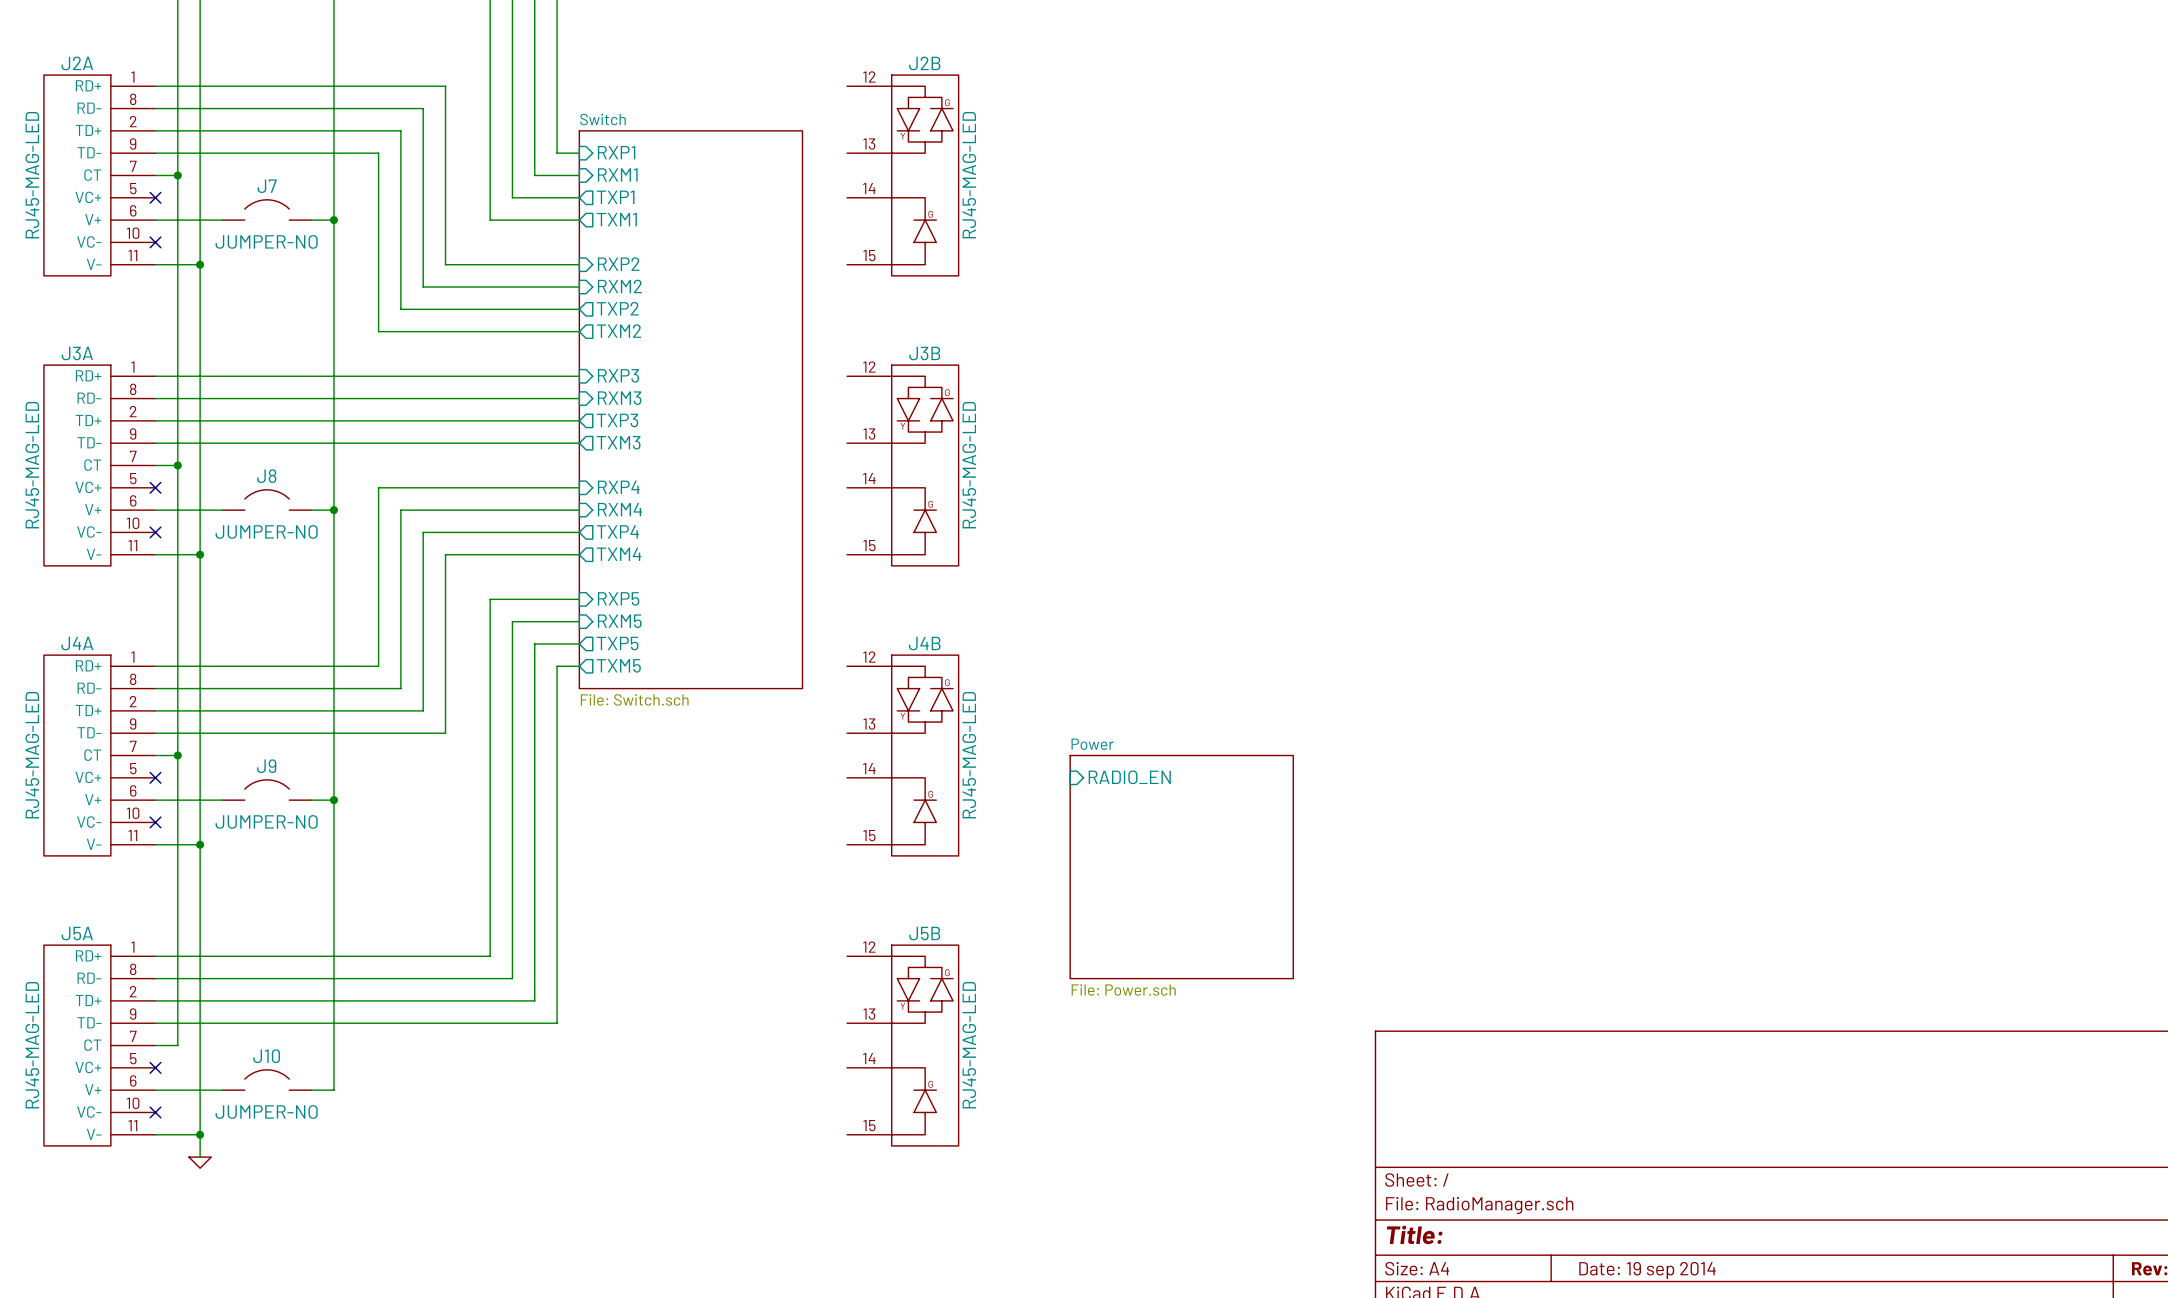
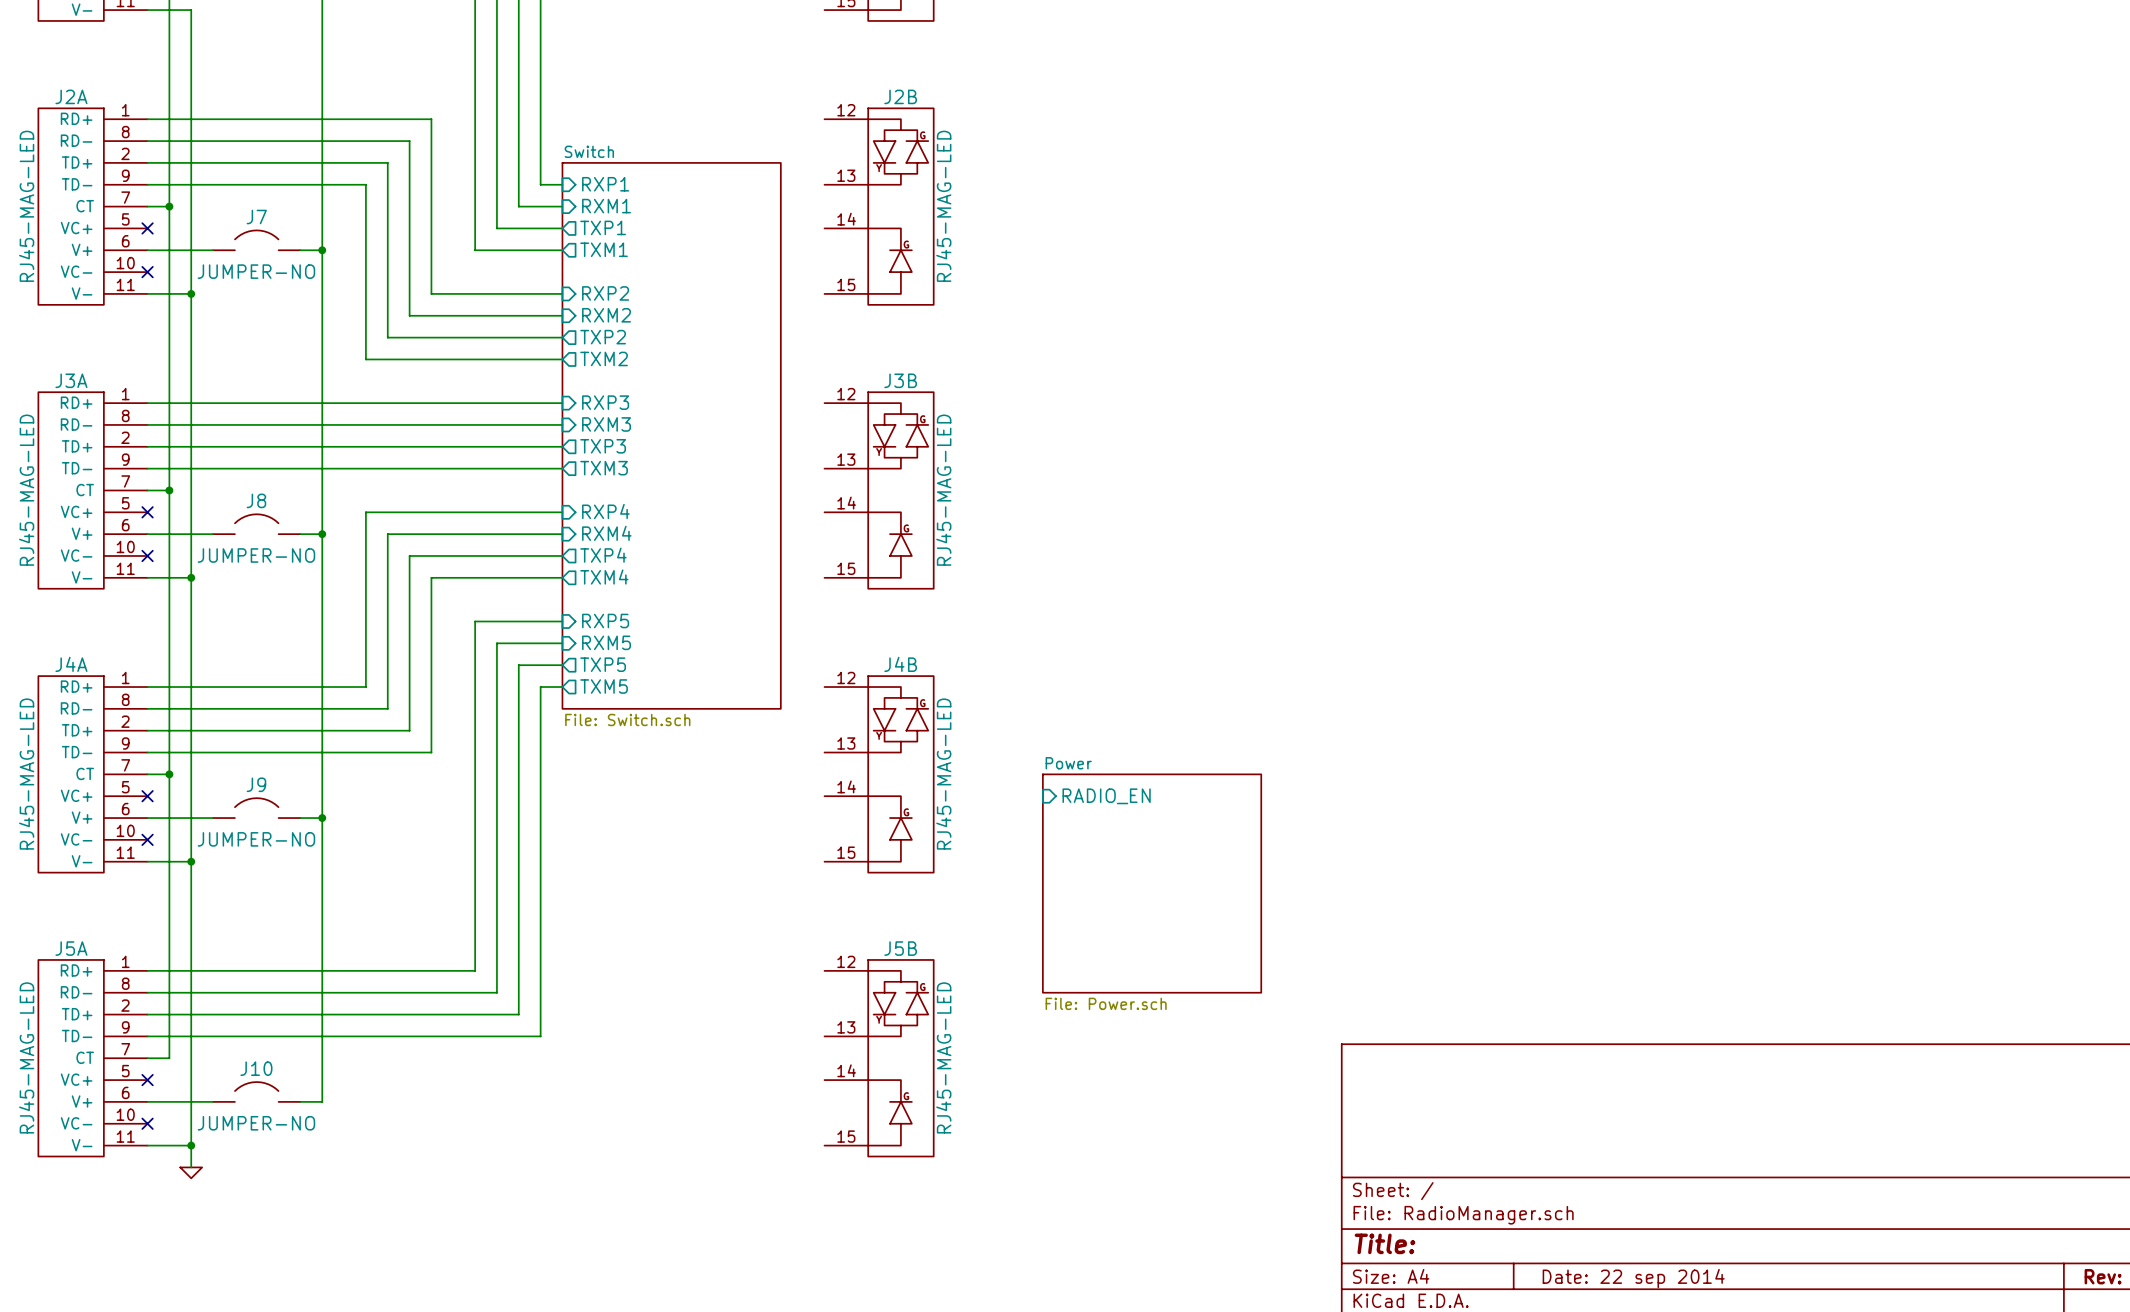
title block: Date: 19 sep 2014 (1647, 1270) -> Date: 22 sep 2014 (1633, 1278)

